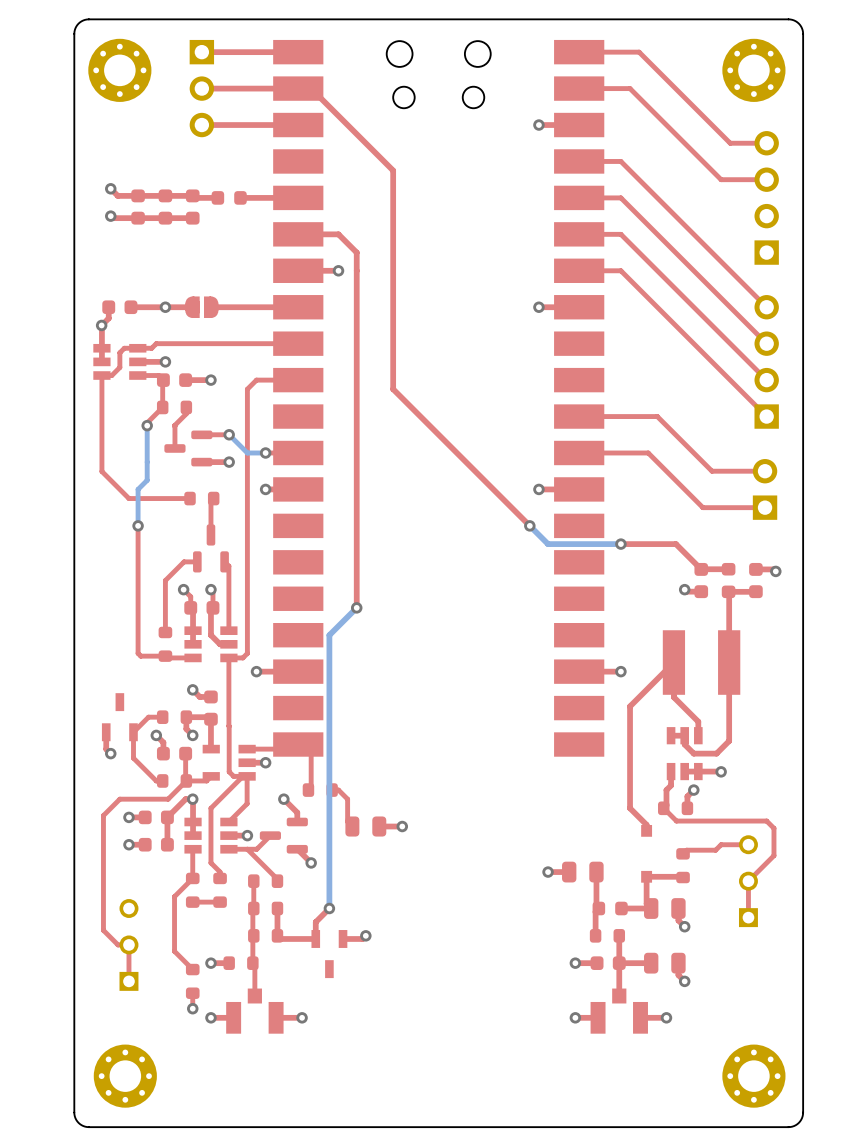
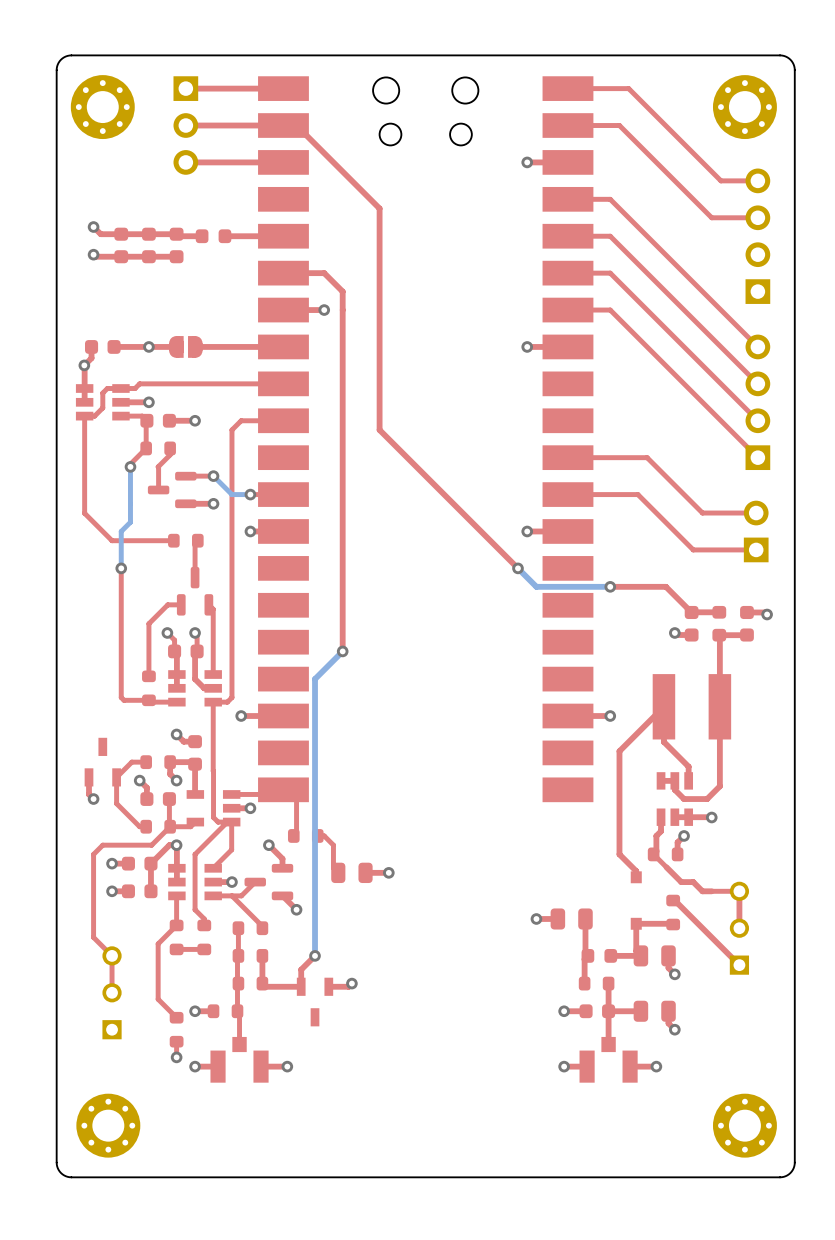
top track: (110, 808) (103, 815) (103, 930) (118, 944) (128, 944) (128, 981) -> (93, 854) (93, 937) (112, 955) (112, 992)
top track: (676, 821) (766, 821) (773, 828) (773, 855) (748, 881) (748, 917) -> (674, 900) (739, 965)
top track: (721, 844) (715, 850) (686, 850) (683, 853) -> (711, 891) (702, 891) (693, 882) (681, 882) (666, 867)
top track: none -> (739, 891) (739, 928)

